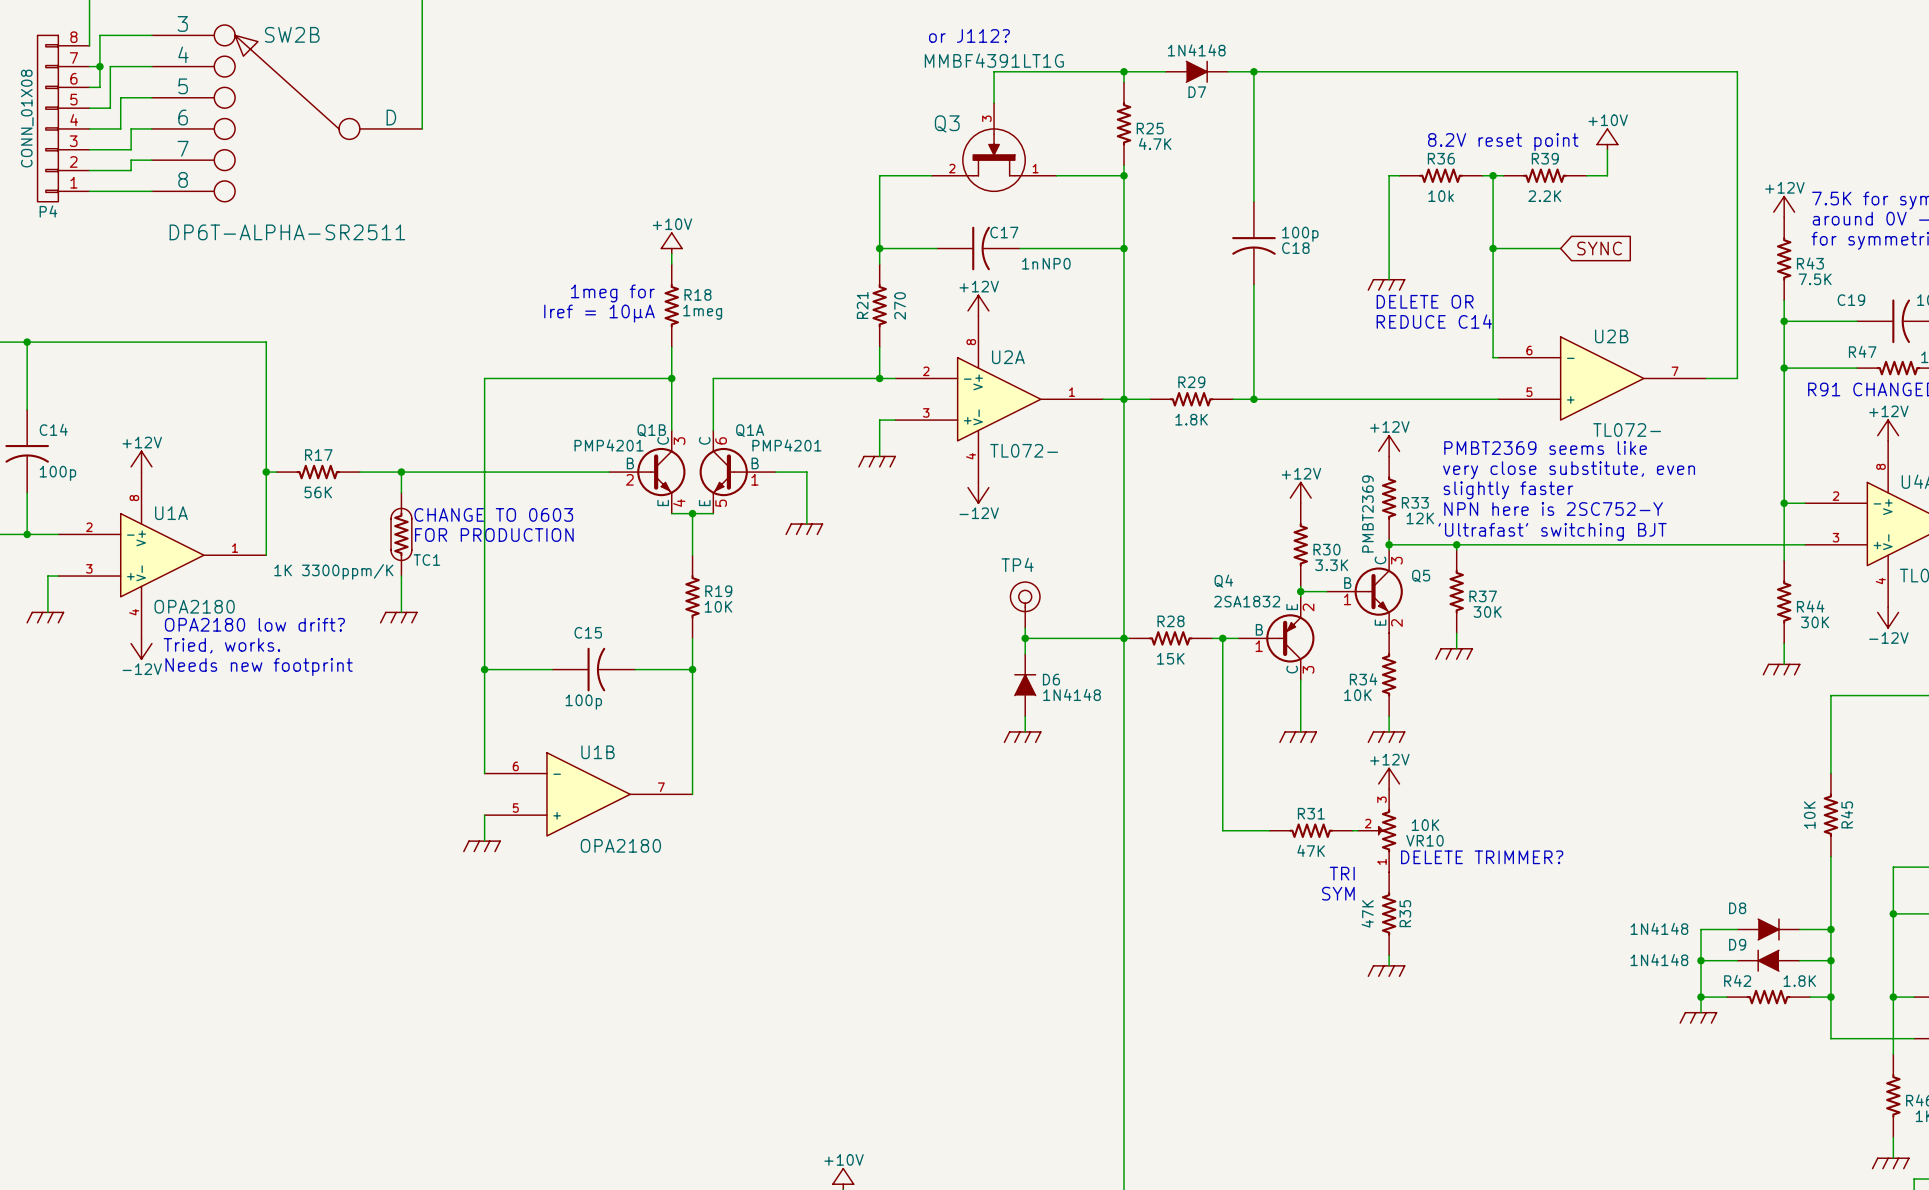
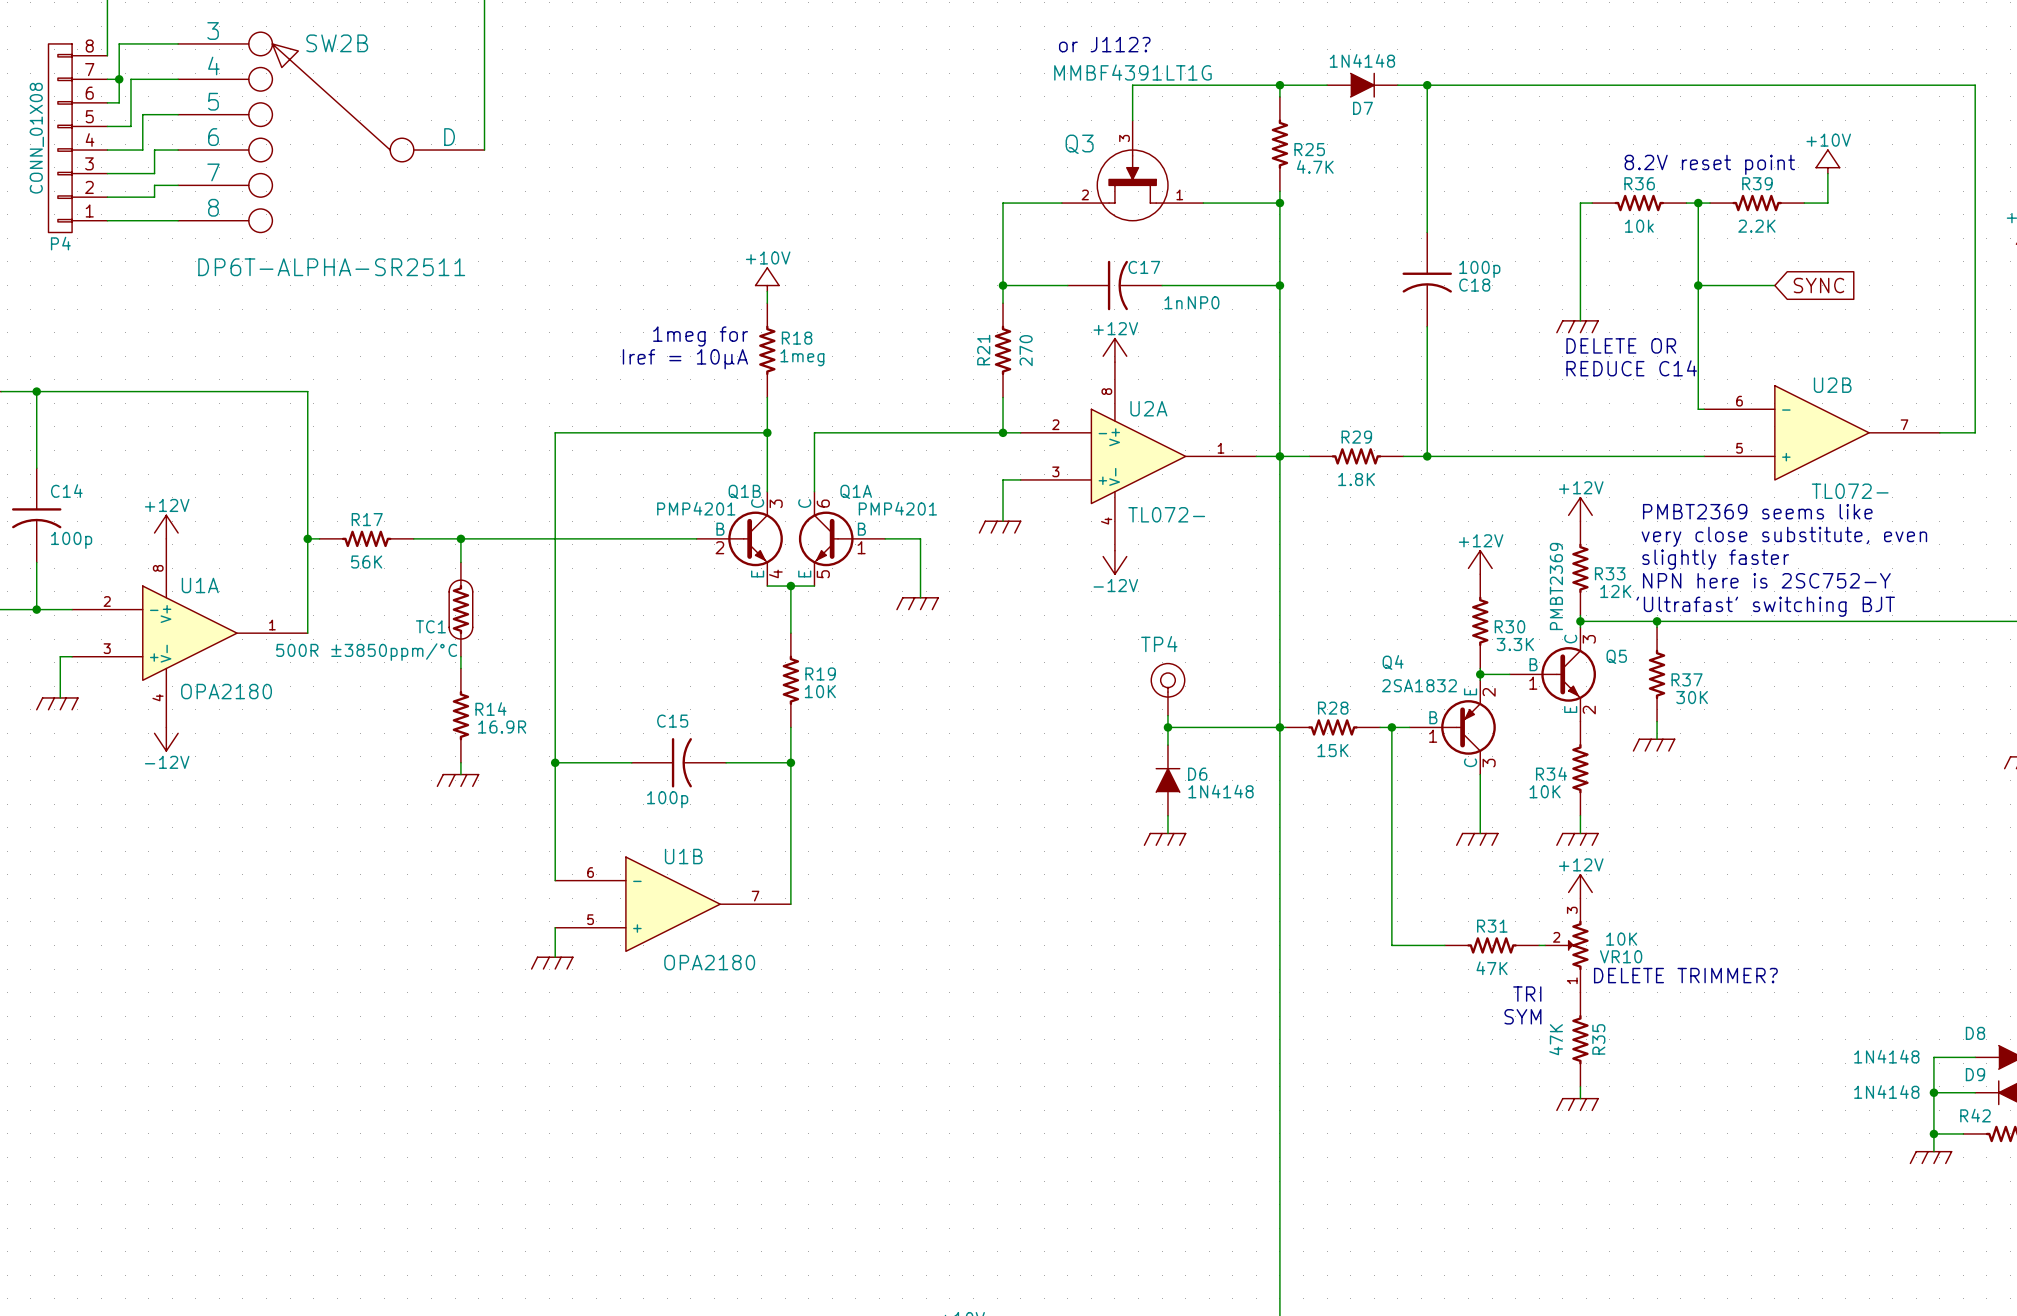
text: CHANGE TO 0603 (493, 514) -> none
text: FOR PRODUCTION (494, 535) -> none
TC1 name position: TC1 (426, 560) -> TC1 (430, 626)
TC1 value: 1K 3300ppm/K (333, 571) -> 500R ±3850ppm/°C (366, 652)
power symbol position: (398, 617) -> (457, 780)
text: OPA2180 low drift? (254, 624) -> none
R14: none -> 16.9R (460, 715)
text: Tried, works. (221, 645) -> none
text: Needs new footprint (259, 667) -> none
wire: none -> (460, 762) (460, 774)

